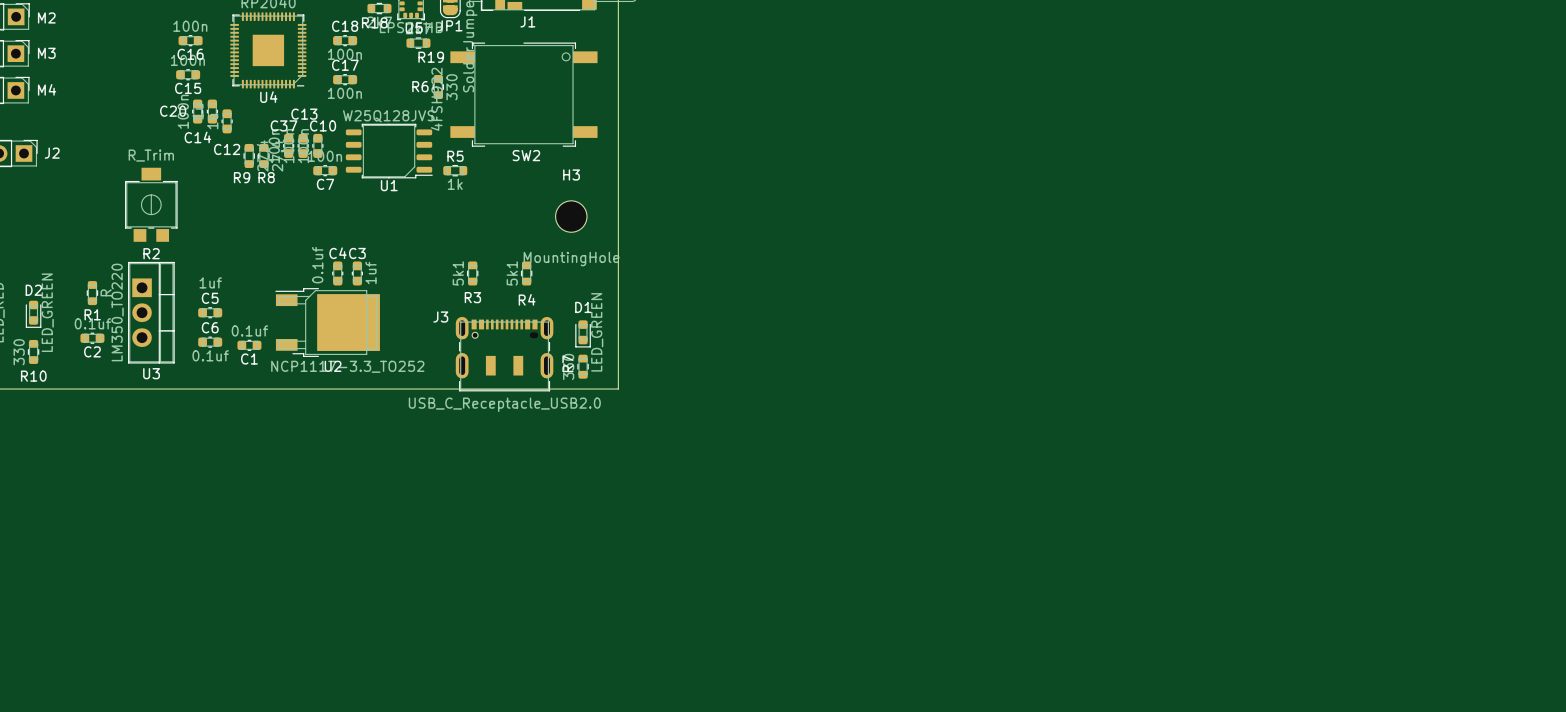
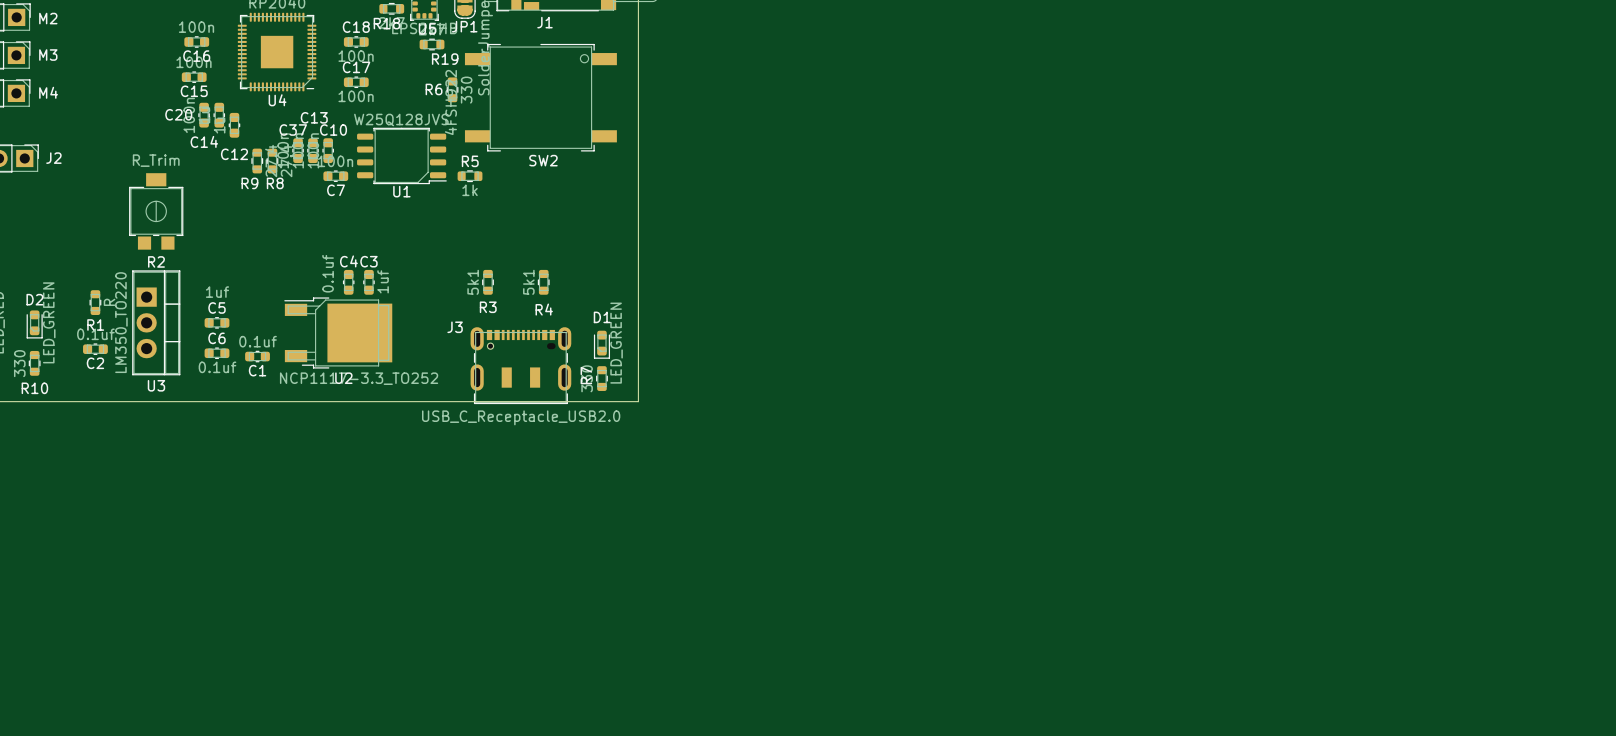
H3: MountingHole (571, 216) -> none

